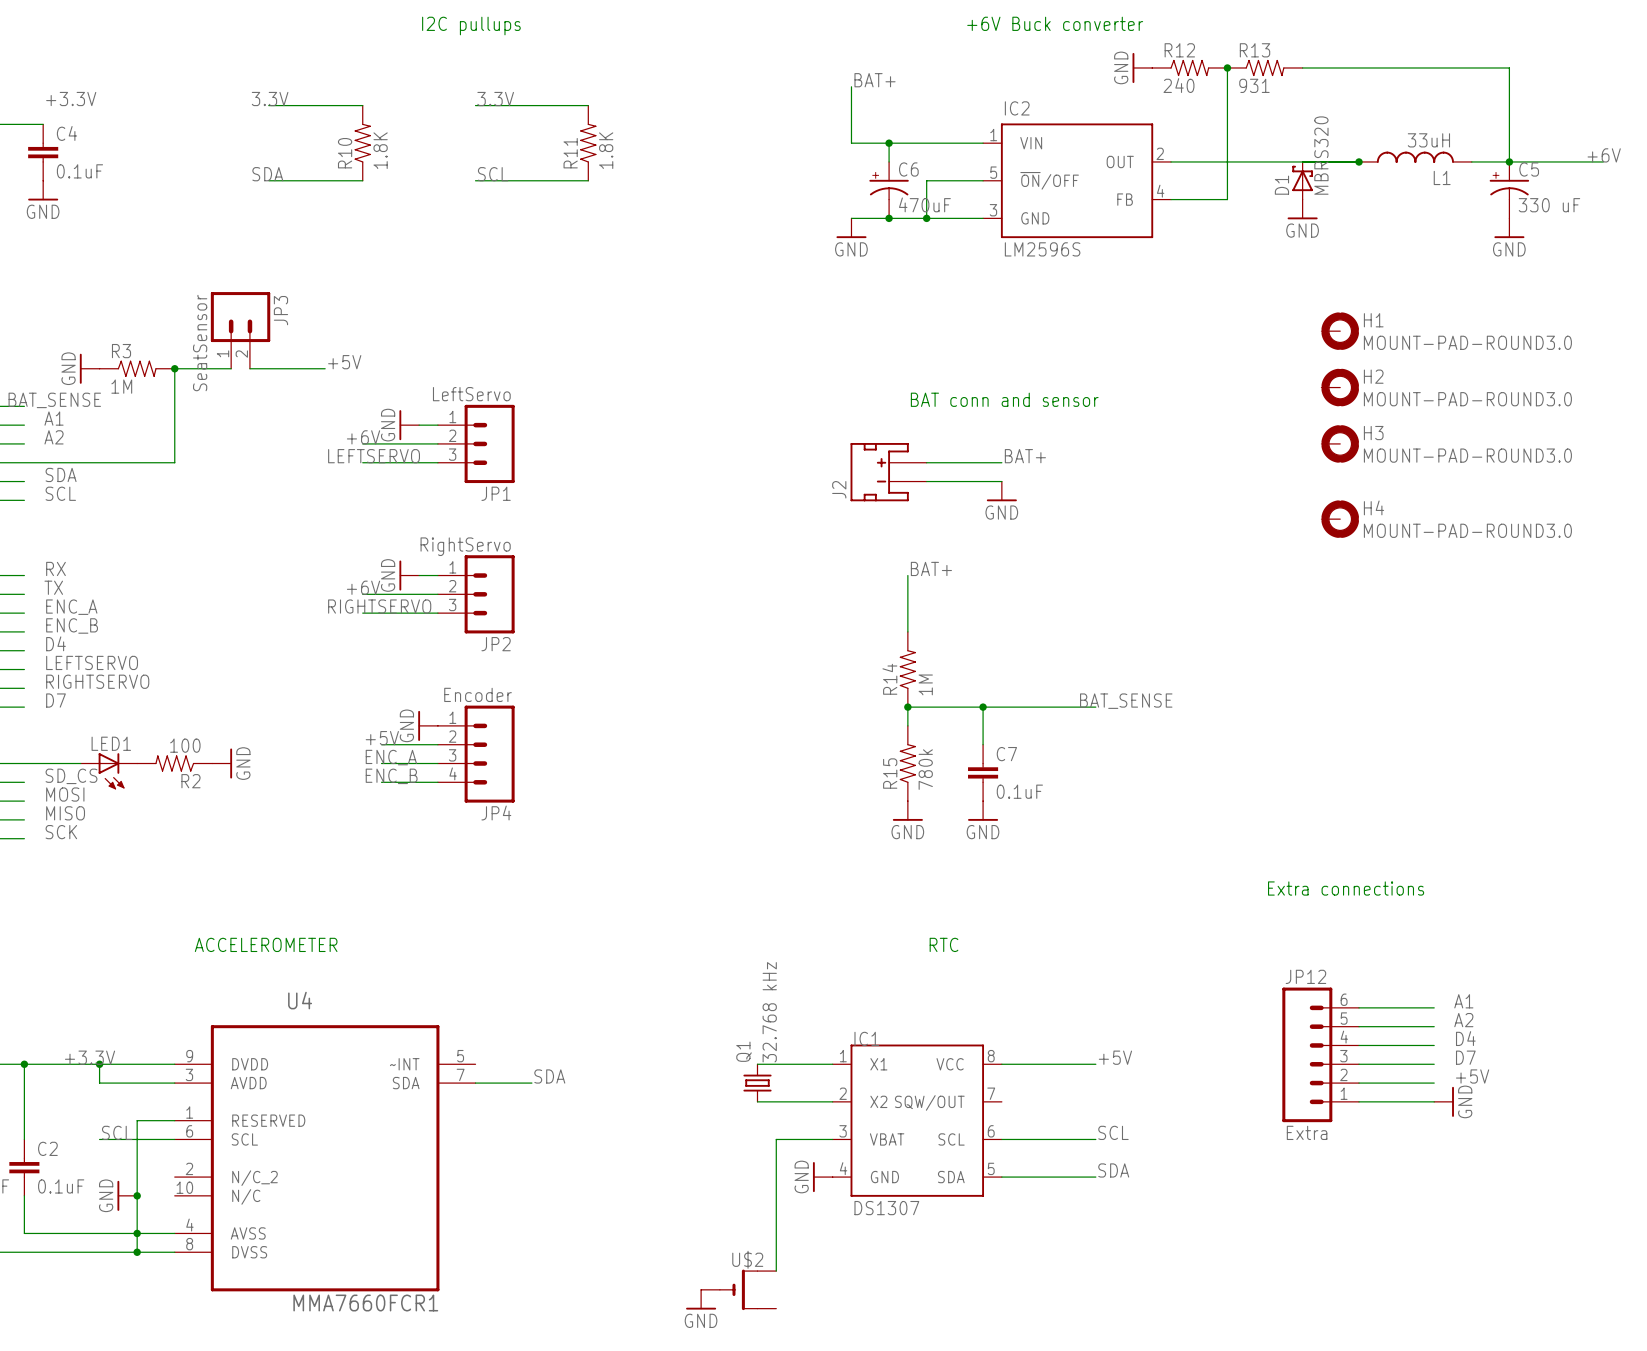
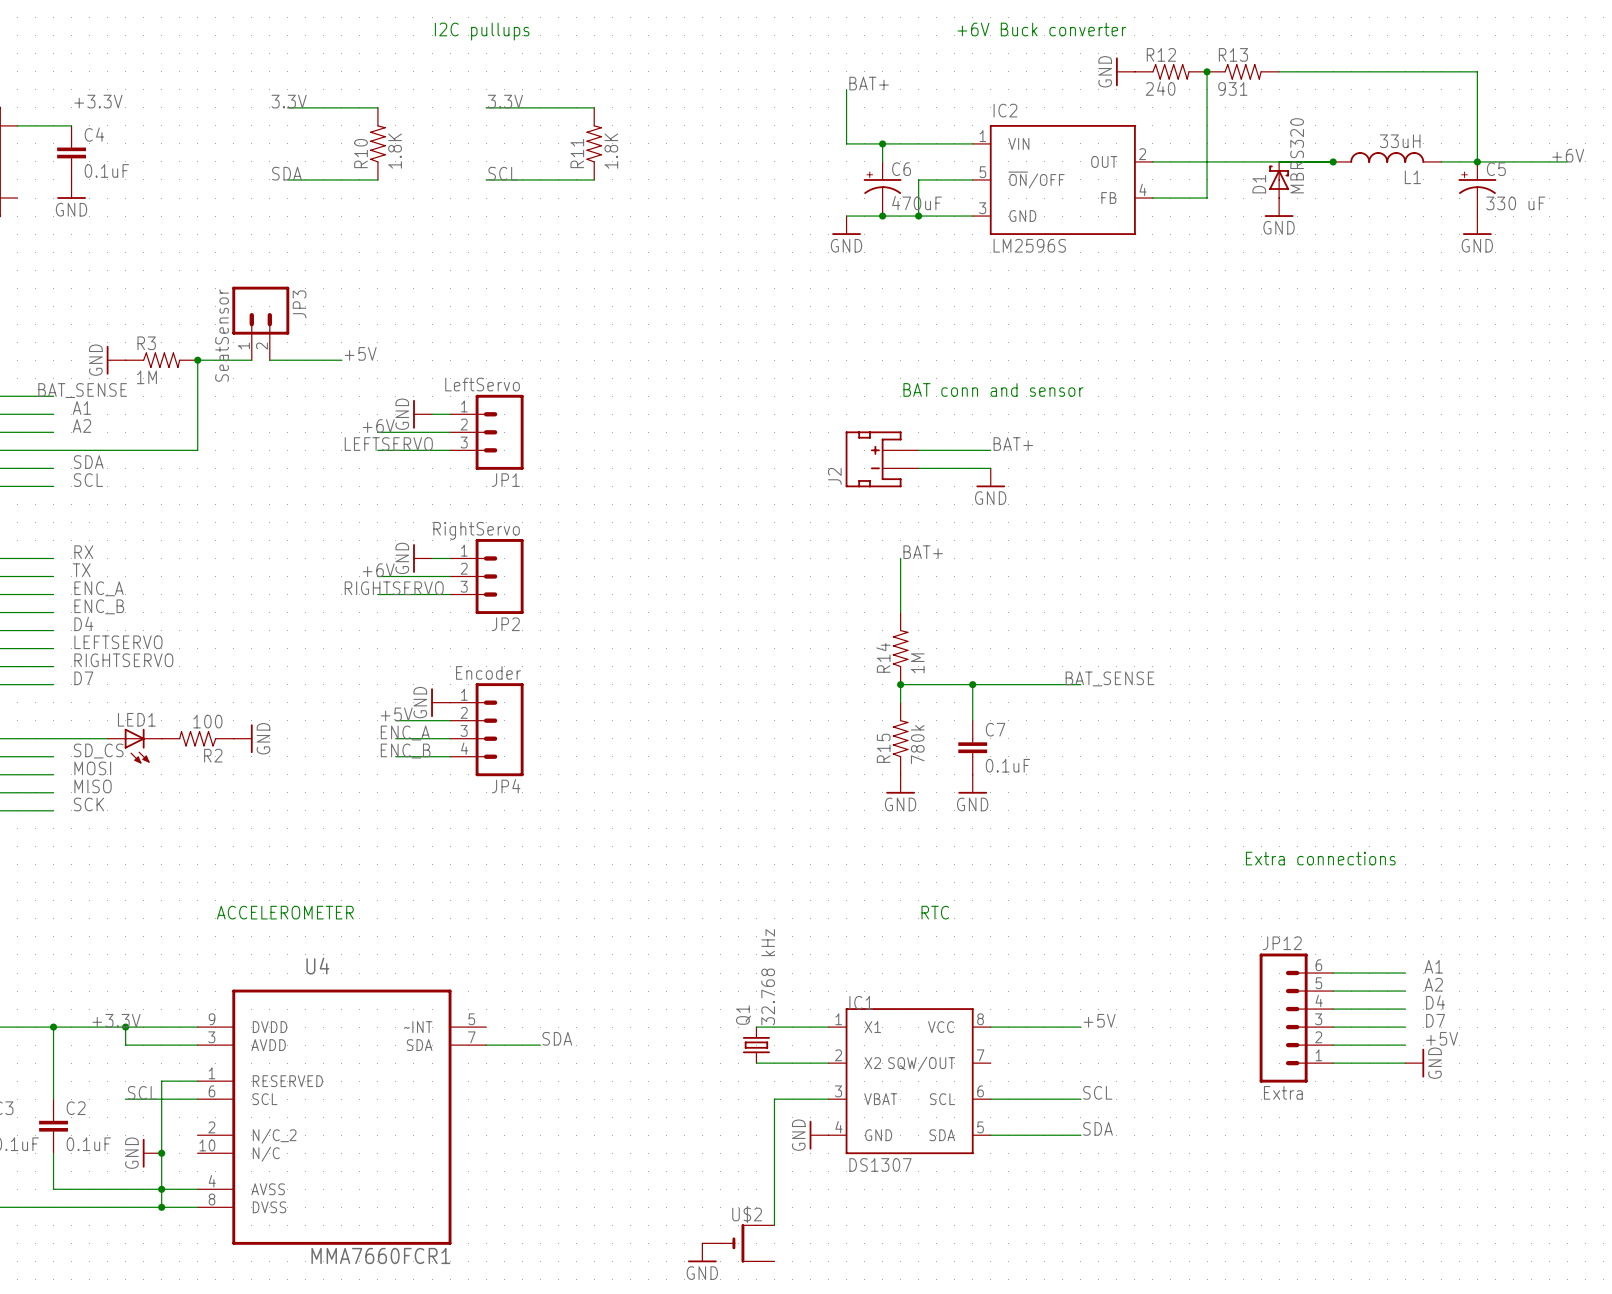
H1: MOUNT-PAD-ROUND3.0 (1340, 331) -> none
H2: MOUNT-PAD-ROUND3.0 (1340, 387) -> none
H3: MOUNT-PAD-ROUND3.0 (1340, 443) -> none
H4: MOUNT-PAD-ROUND3.0 (1340, 519) -> none

